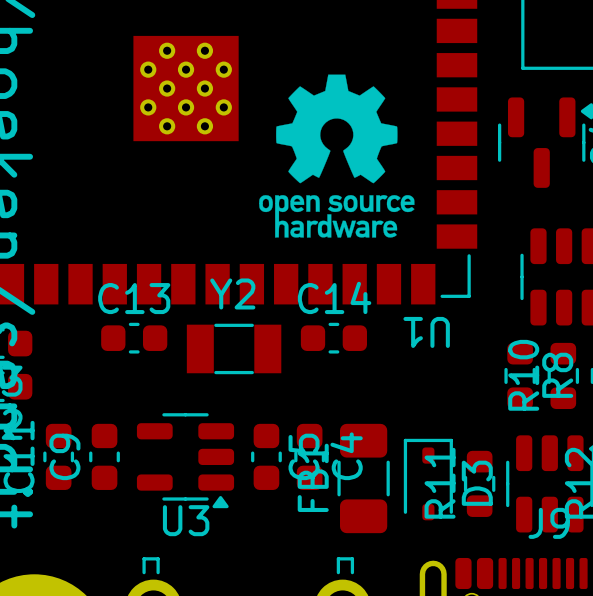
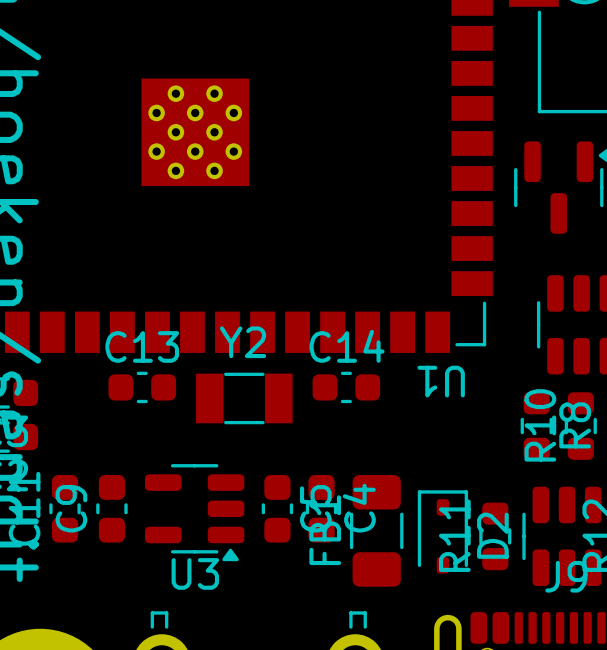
drawing: [259, 74, 415, 238] -> none
D3 name: D3 (477, 483) -> D2 (492, 535)

